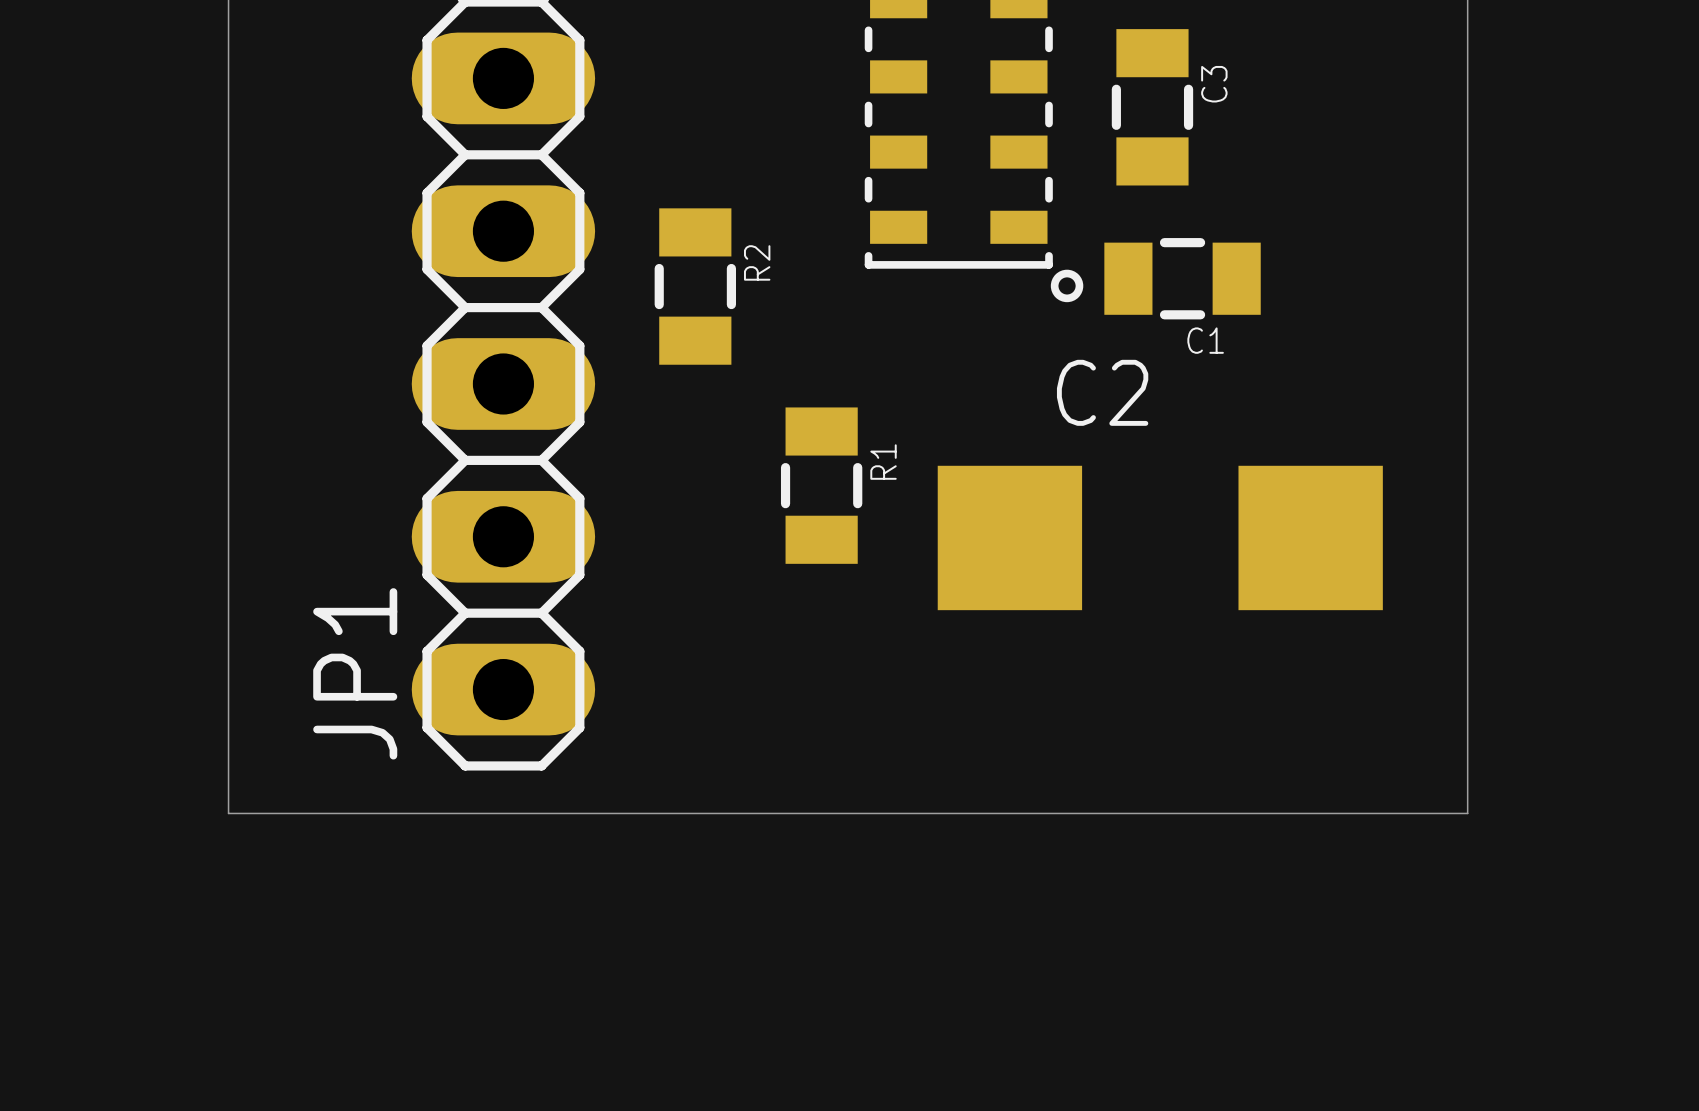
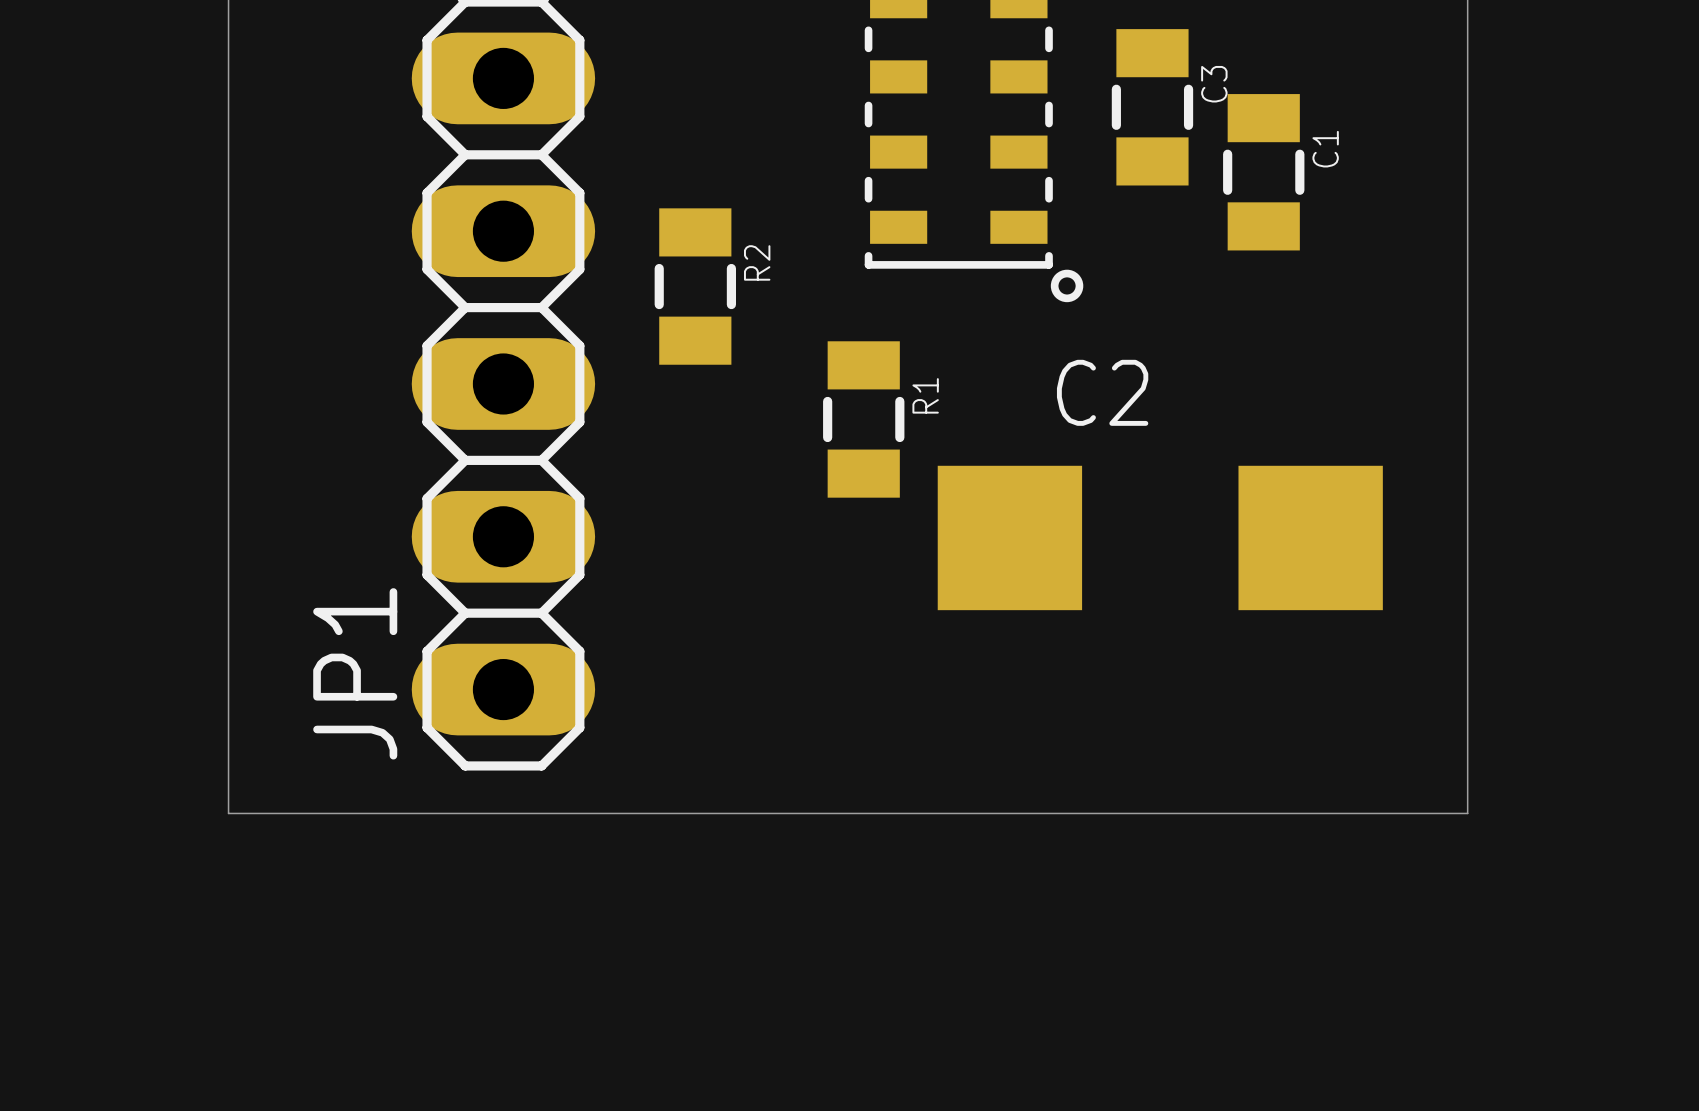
C1 rotation: 0° (1182, 278) -> 90° clockwise (1263, 172)
C1 position: (1182, 278) -> (1263, 172)
R1 position: (821, 485) -> (863, 419)

